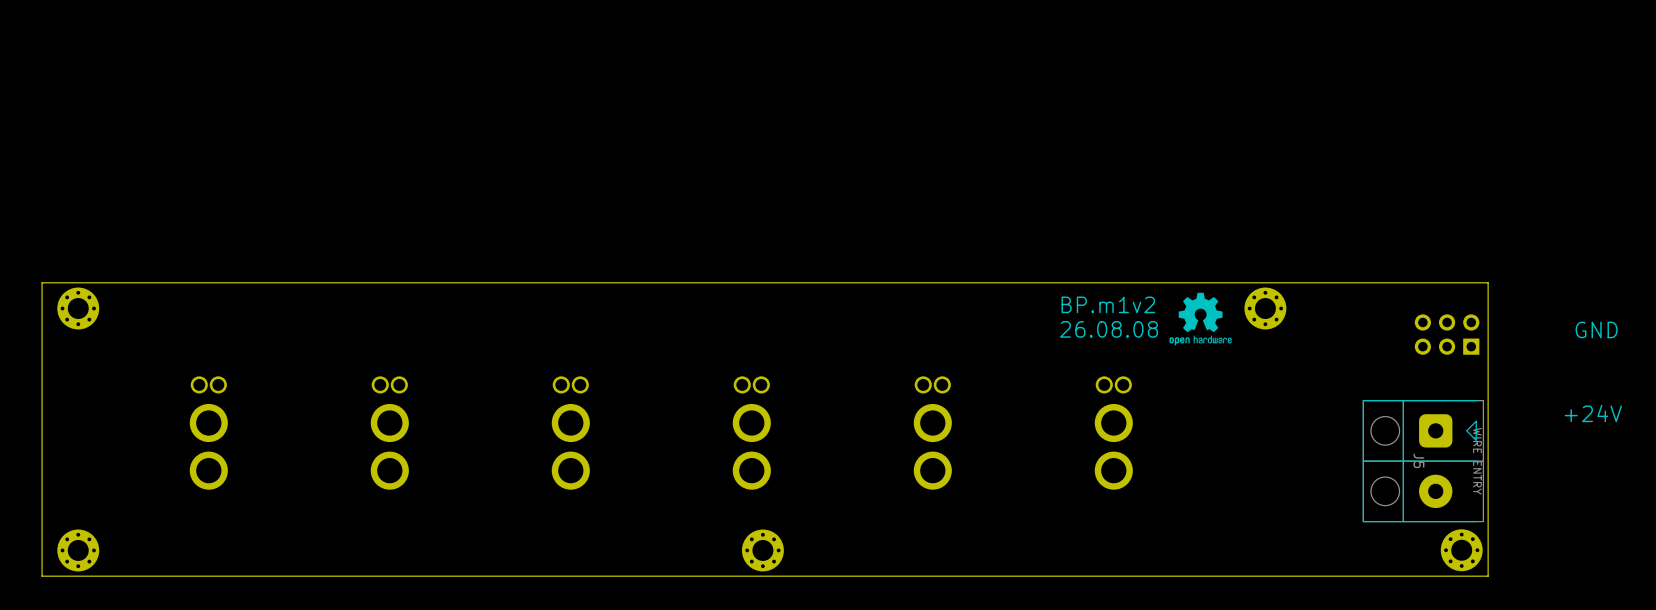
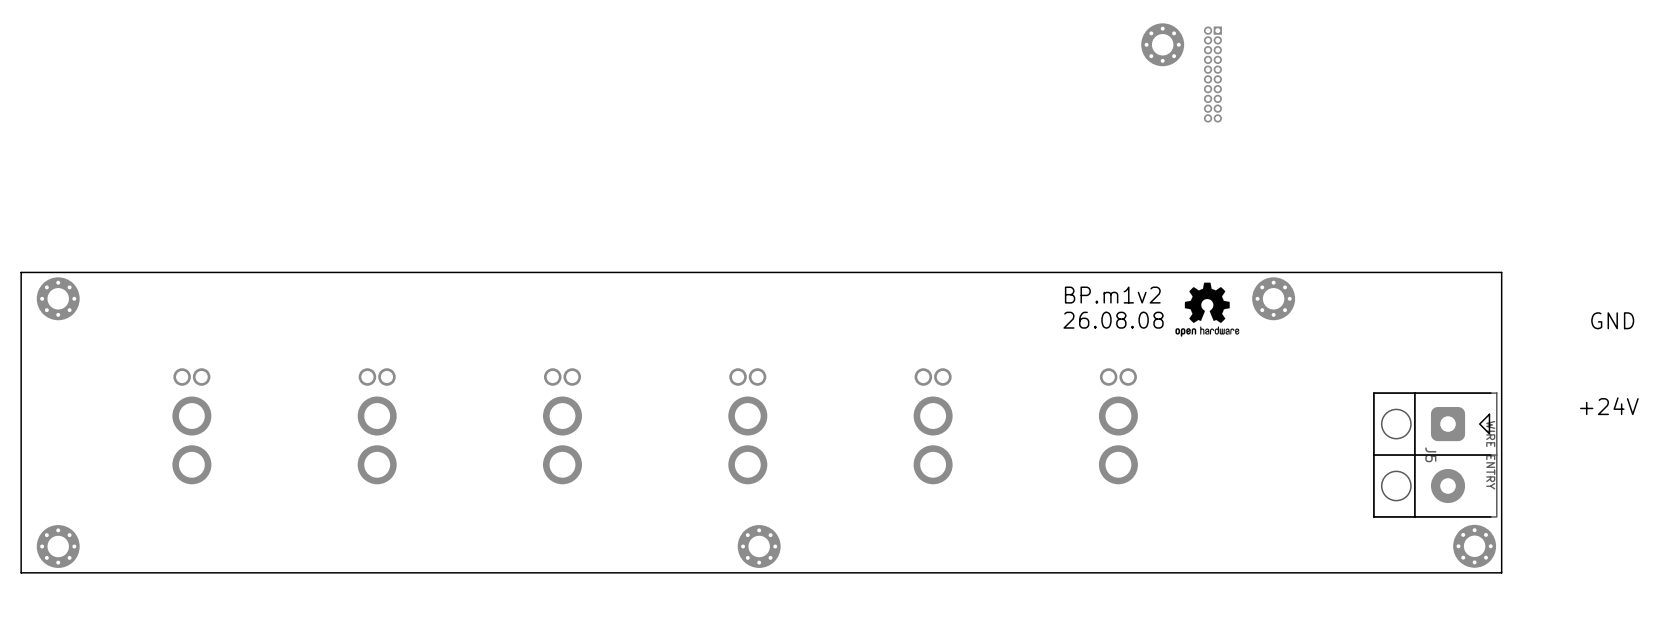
part: none -> (1162, 44)
part: none -> (1212, 74)
part: (1447, 334) -> none

